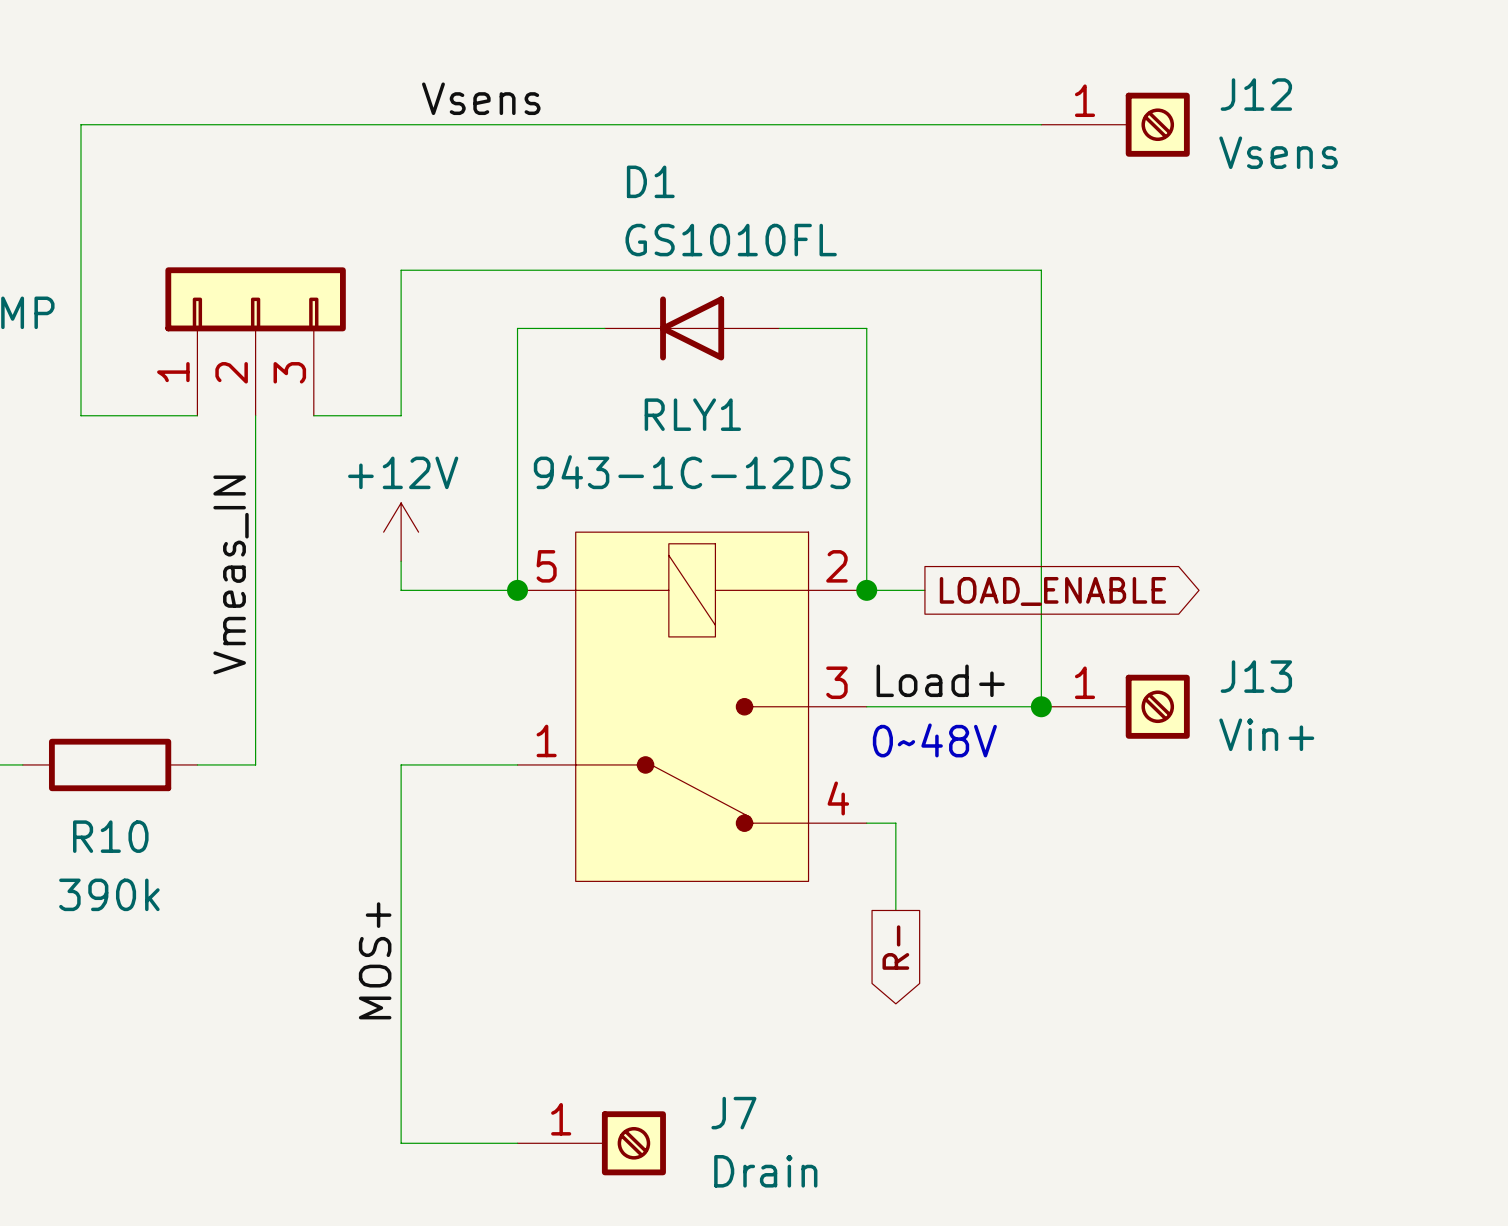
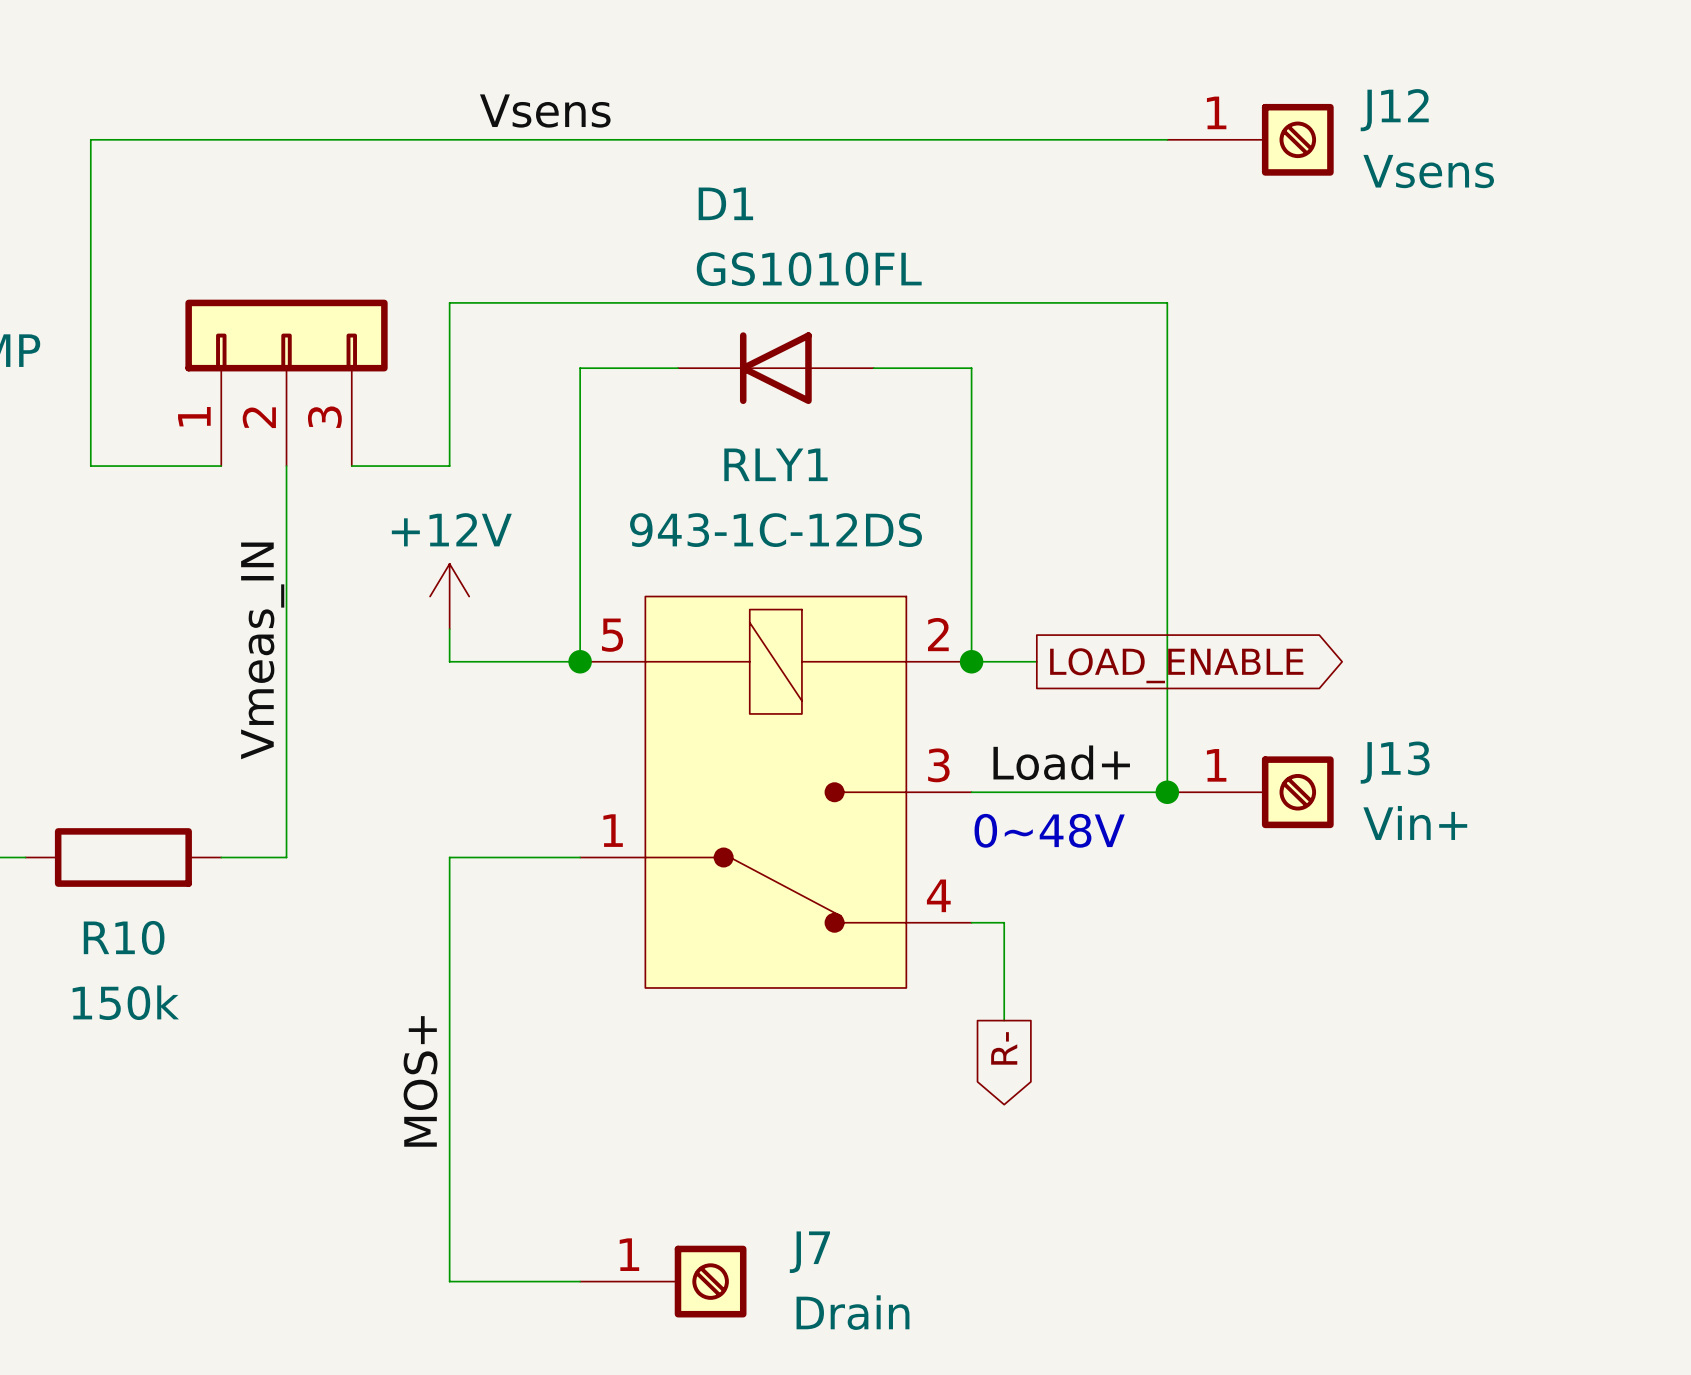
R10 value: 390k (109, 894) -> 150k (125, 1002)

